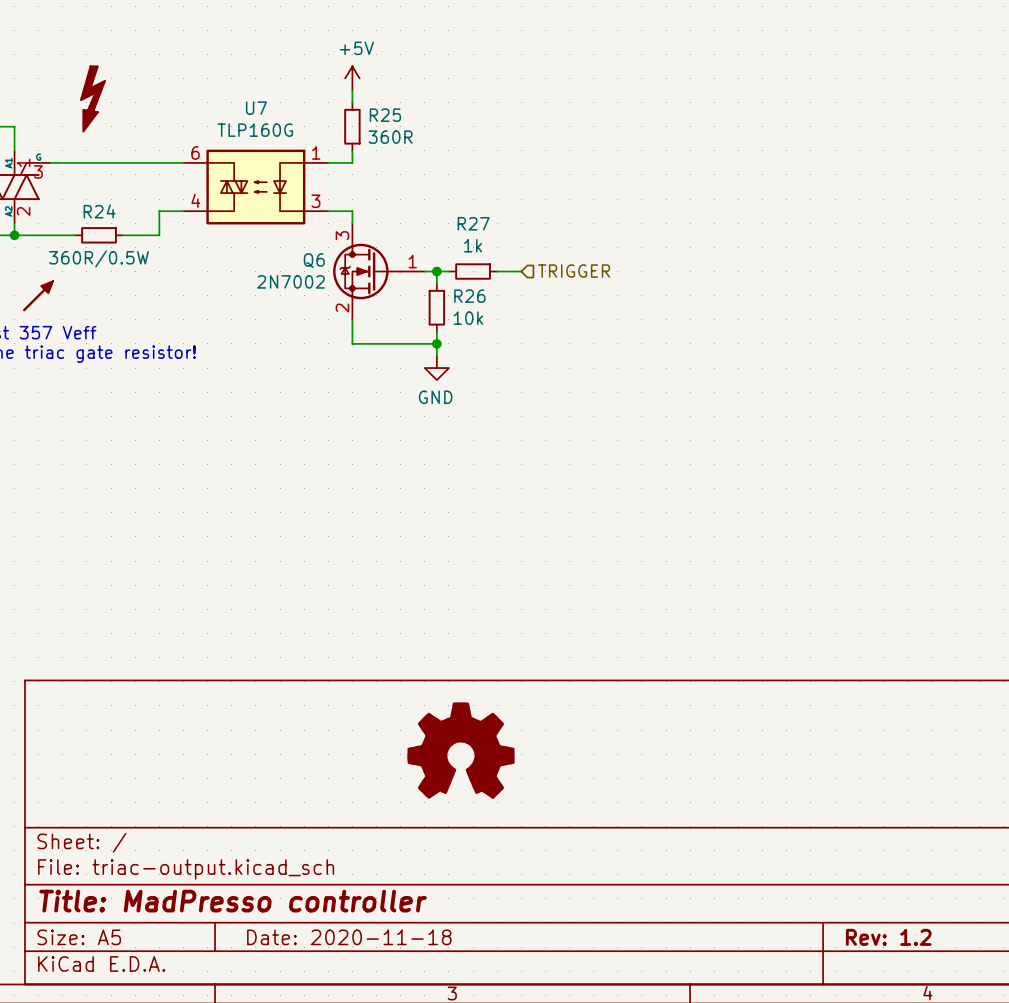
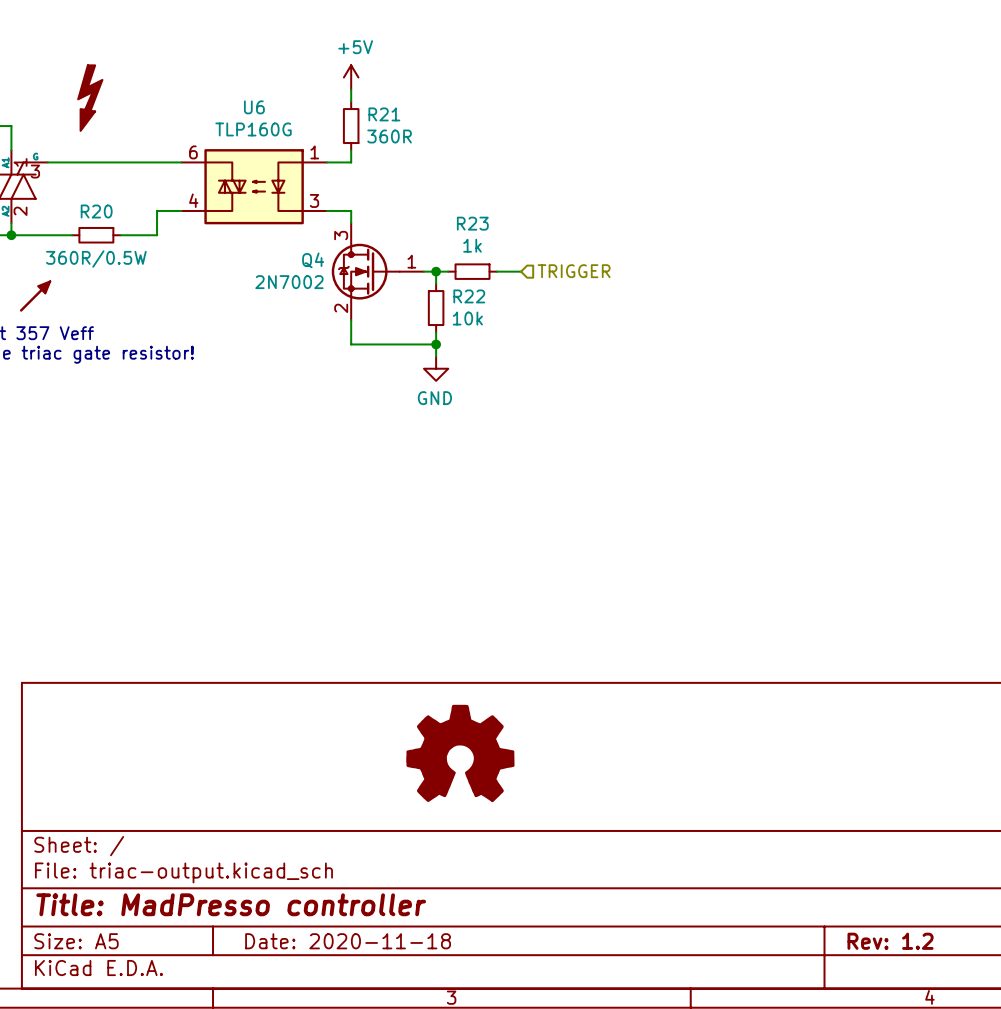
U7 name: U7 (256, 108) -> U6 (254, 107)
R25 name: R25 (385, 115) -> R21 (384, 114)
R24 name: R24 (99, 211) -> R20 (96, 211)
R27 name: R27 (473, 223) -> R23 (472, 223)
Q6 name: Q6 (314, 260) -> Q4 (313, 260)
R26 name: R26 (469, 296) -> R22 (469, 296)

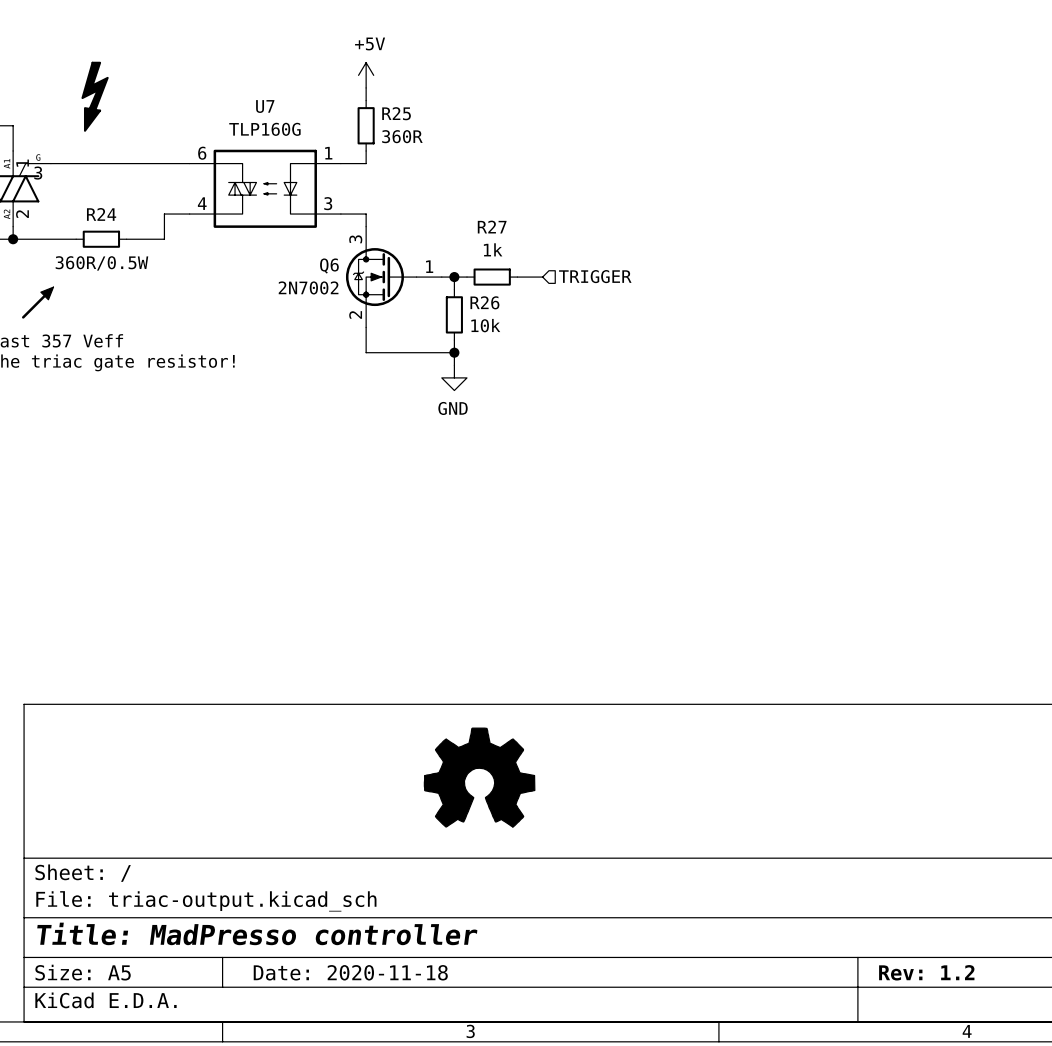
U6 name: U6 (254, 107) -> U7 (265, 106)
R21 name: R21 (384, 114) -> R25 (396, 113)
R20 name: R20 (96, 211) -> R24 (101, 214)
R23 name: R23 (472, 223) -> R27 (492, 227)
Q4 name: Q4 (313, 260) -> Q6 (329, 266)
R22 name: R22 (469, 296) -> R26 (484, 302)

